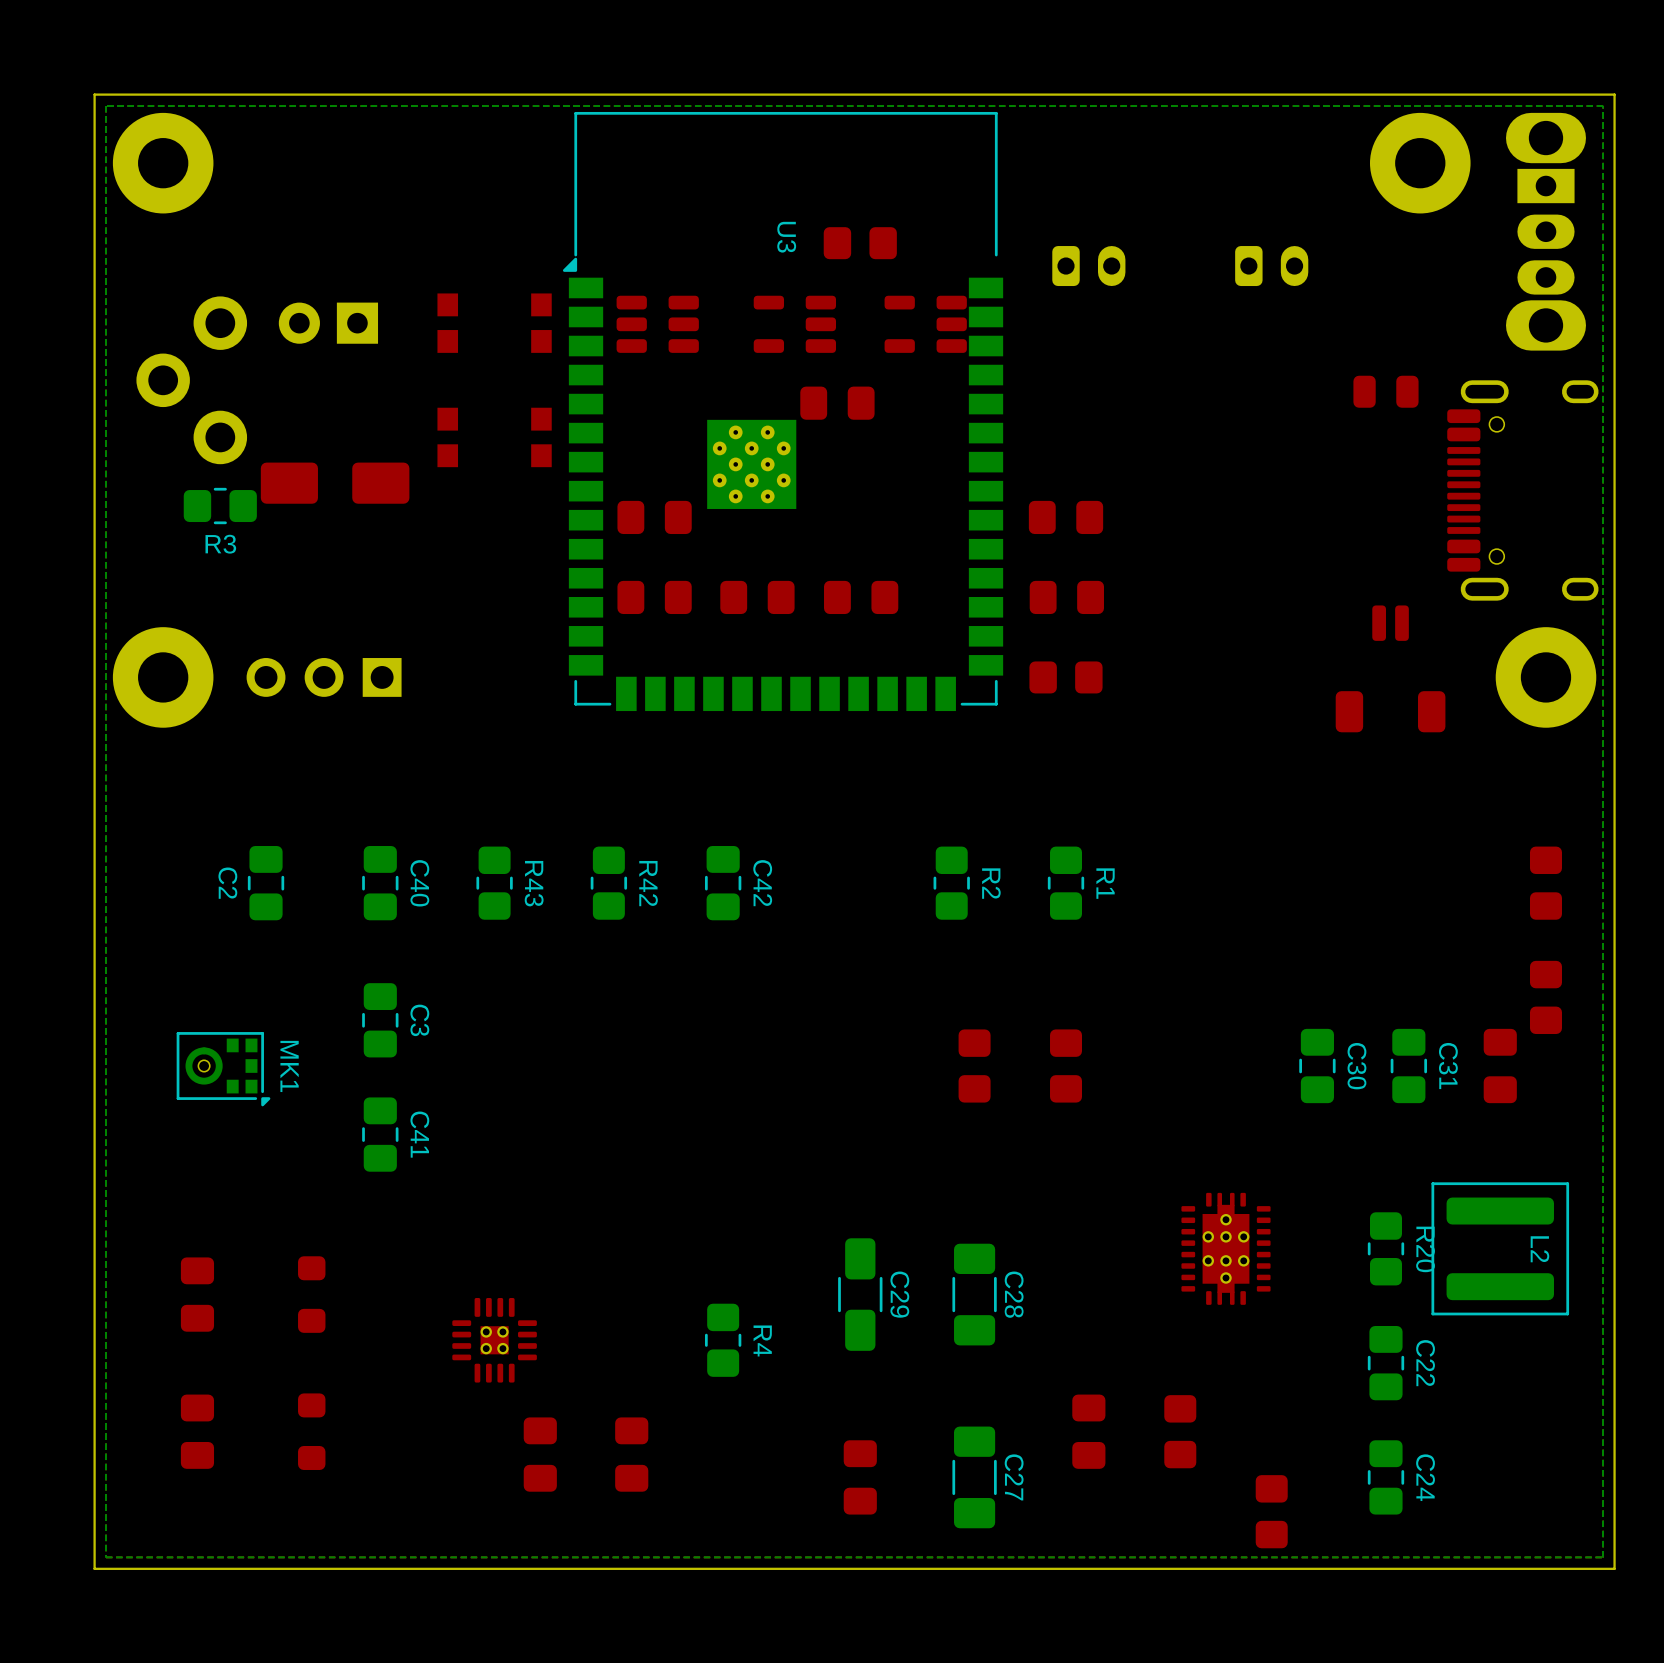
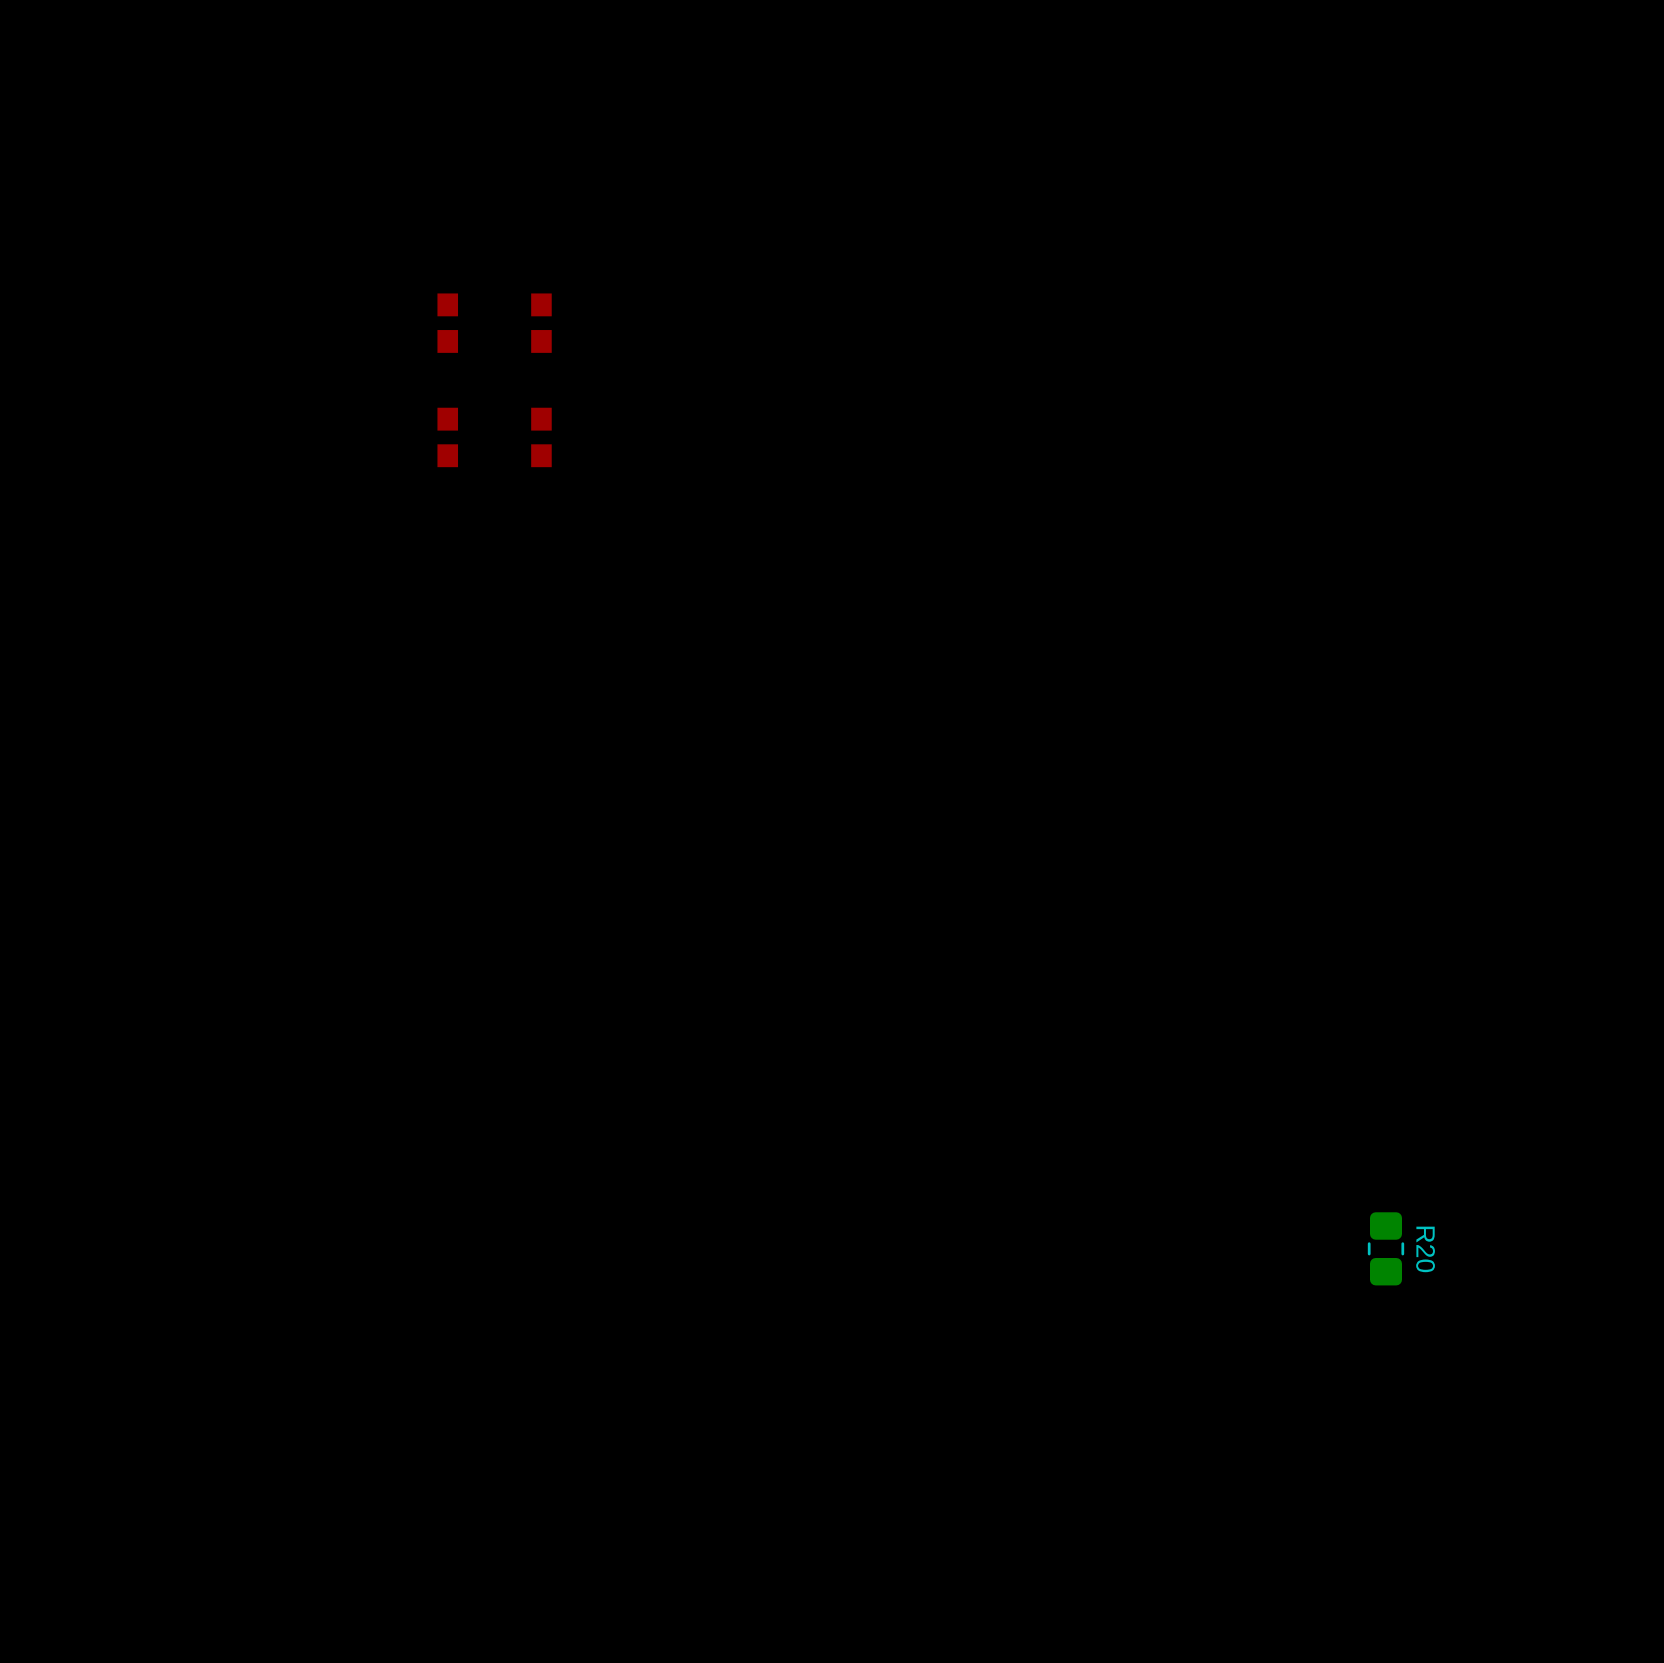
board edge: (1614, 94) (94, 94) (94, 1568) (1614, 1568) (1614, 94) -> none
bottom zone outline: (1603, 106) (106, 106) (106, 1557) (1603, 1557) (1603, 106) -> none
part: (163, 163) -> none
part: (1420, 163) -> none
part: (1545, 231) -> none
part: (860, 243) -> none
part: (1088, 266) -> none
part: (1271, 266) -> none
part: (328, 323) -> none
part: (657, 324) -> none
part: (794, 324) -> none
part: (925, 324) -> none
part: (191, 380) -> none
part: (1385, 391) -> none
part: (837, 403) -> none
U3: (783, 411) -> none
part: (335, 483) -> none
part: (1522, 490) -> none
R3: (220, 506) -> none
part: (654, 517) -> none
part: (1066, 517) -> none
part: (654, 597) -> none
part: (757, 597) -> none
part: (861, 597) -> none
part: (1066, 597) -> none
part: (1390, 668) -> none
part: (163, 677) -> none
part: (324, 677) -> none
part: (1066, 677) -> none
part: (1545, 677) -> none
C2: (266, 883) -> none
C40: (380, 883) -> none
R43: (494, 883) -> none
R42: (608, 883) -> none
C42: (723, 883) -> none
R2: (951, 883) -> none
R1: (1066, 883) -> none
part: (1545, 883) -> none
part: (1545, 997) -> none
C3: (380, 1020) -> none
part: (974, 1066) -> none
part: (1066, 1066) -> none
C30: (1317, 1066) -> none
C31: (1408, 1066) -> none
part: (1500, 1066) -> none
MK1: (223, 1069) -> none
C41: (380, 1134) -> none
part: (1226, 1248) -> none
L2: (1500, 1248) -> none
part: (197, 1294) -> none
part: (311, 1294) -> none
C29: (860, 1294) -> none
C28: (974, 1294) -> none
part: (494, 1340) -> none
R4: (723, 1340) -> none
C22: (1385, 1363) -> none
part: (197, 1431) -> none
part: (311, 1431) -> none
part: (1088, 1431) -> none
part: (1180, 1431) -> none
part: (540, 1454) -> none
part: (631, 1454) -> none
part: (860, 1477) -> none
C27: (974, 1477) -> none
C24: (1385, 1477) -> none
part: (1271, 1511) -> none

